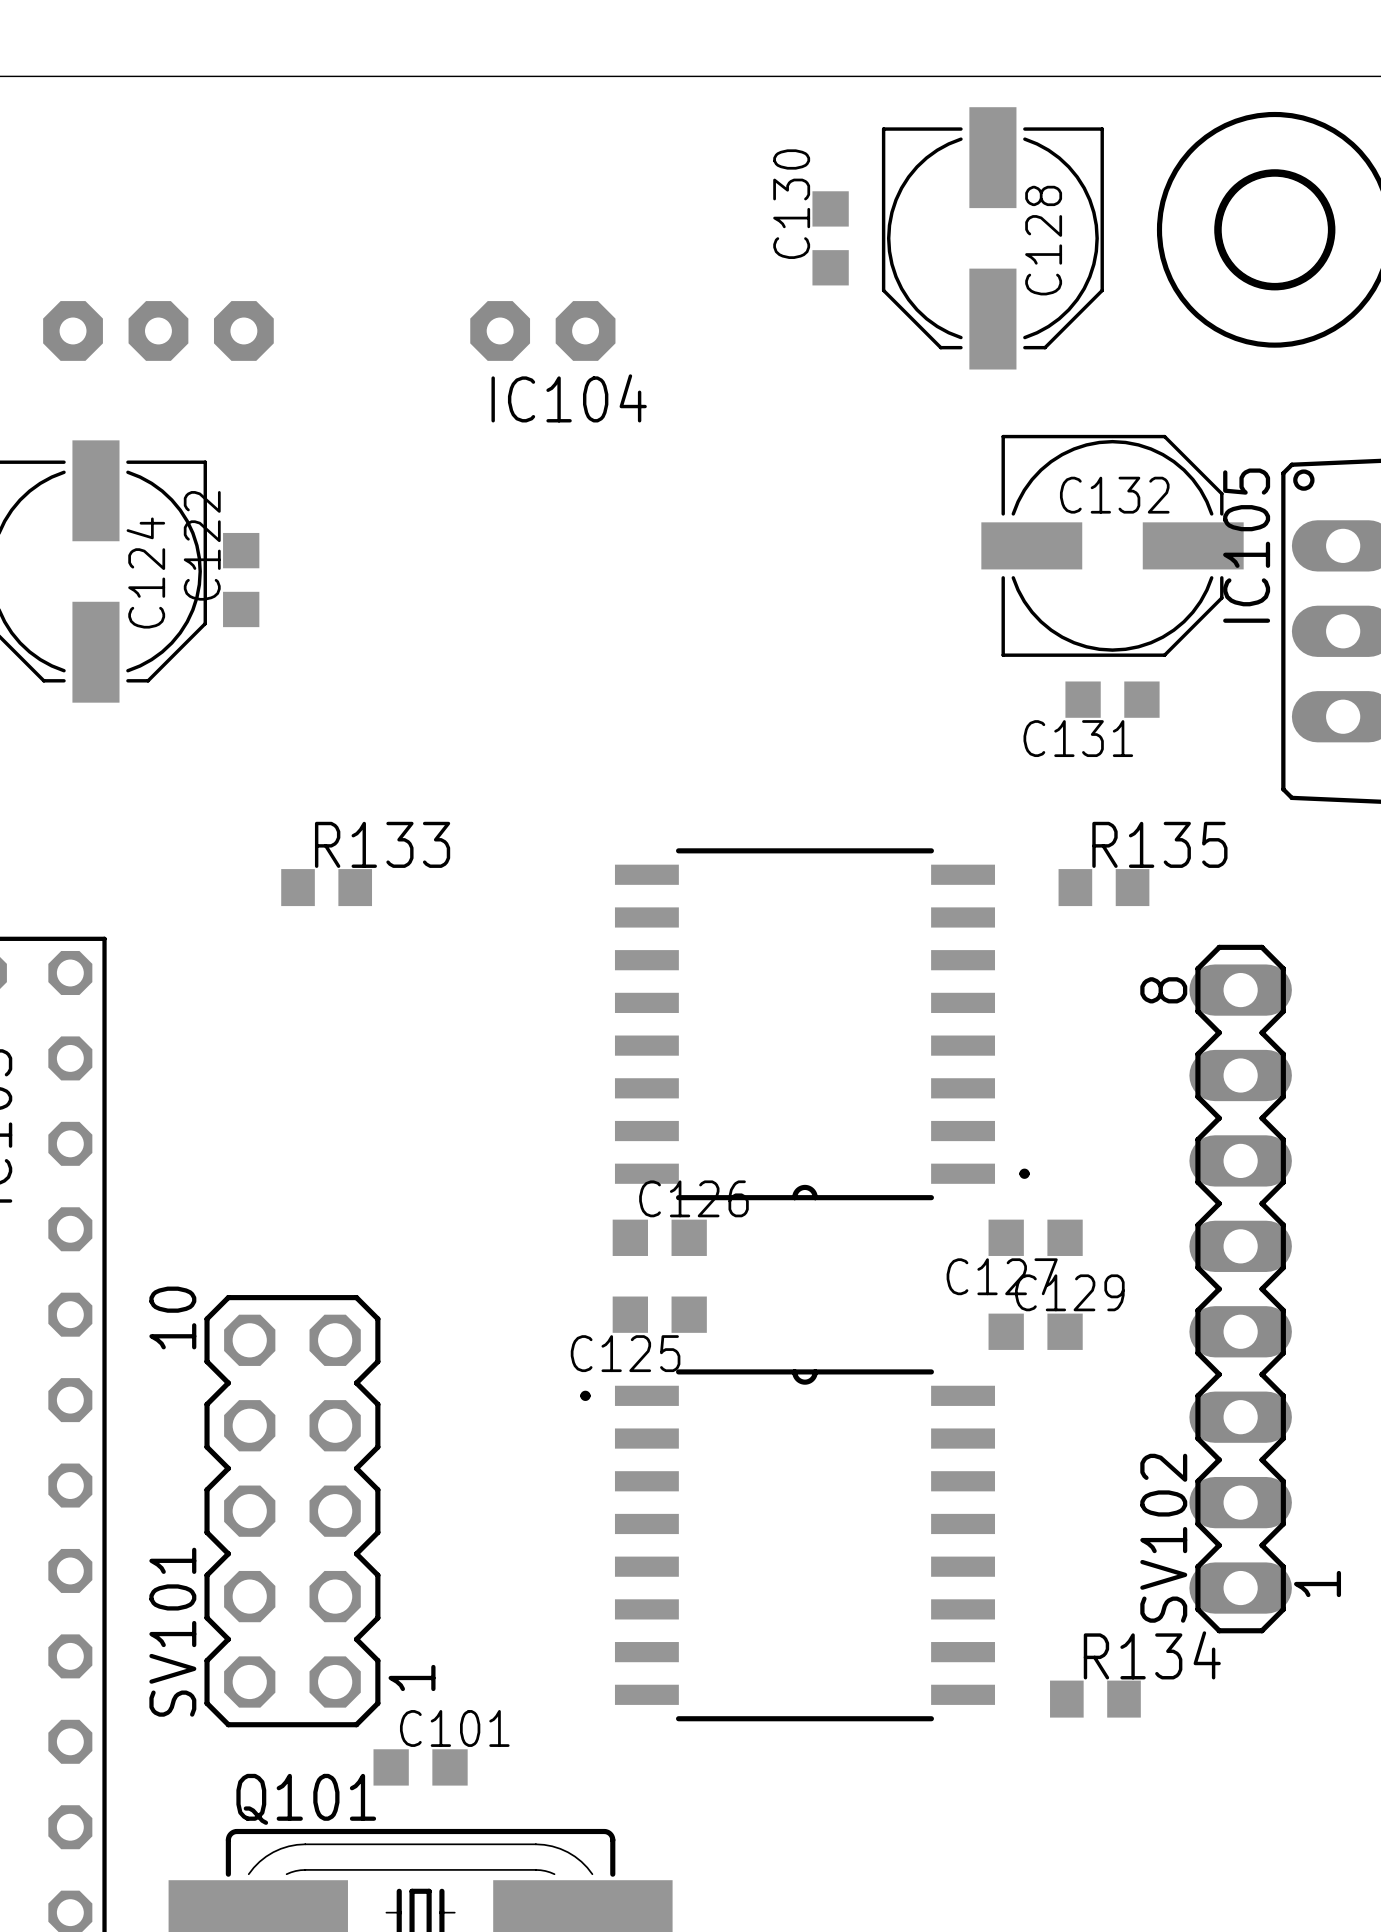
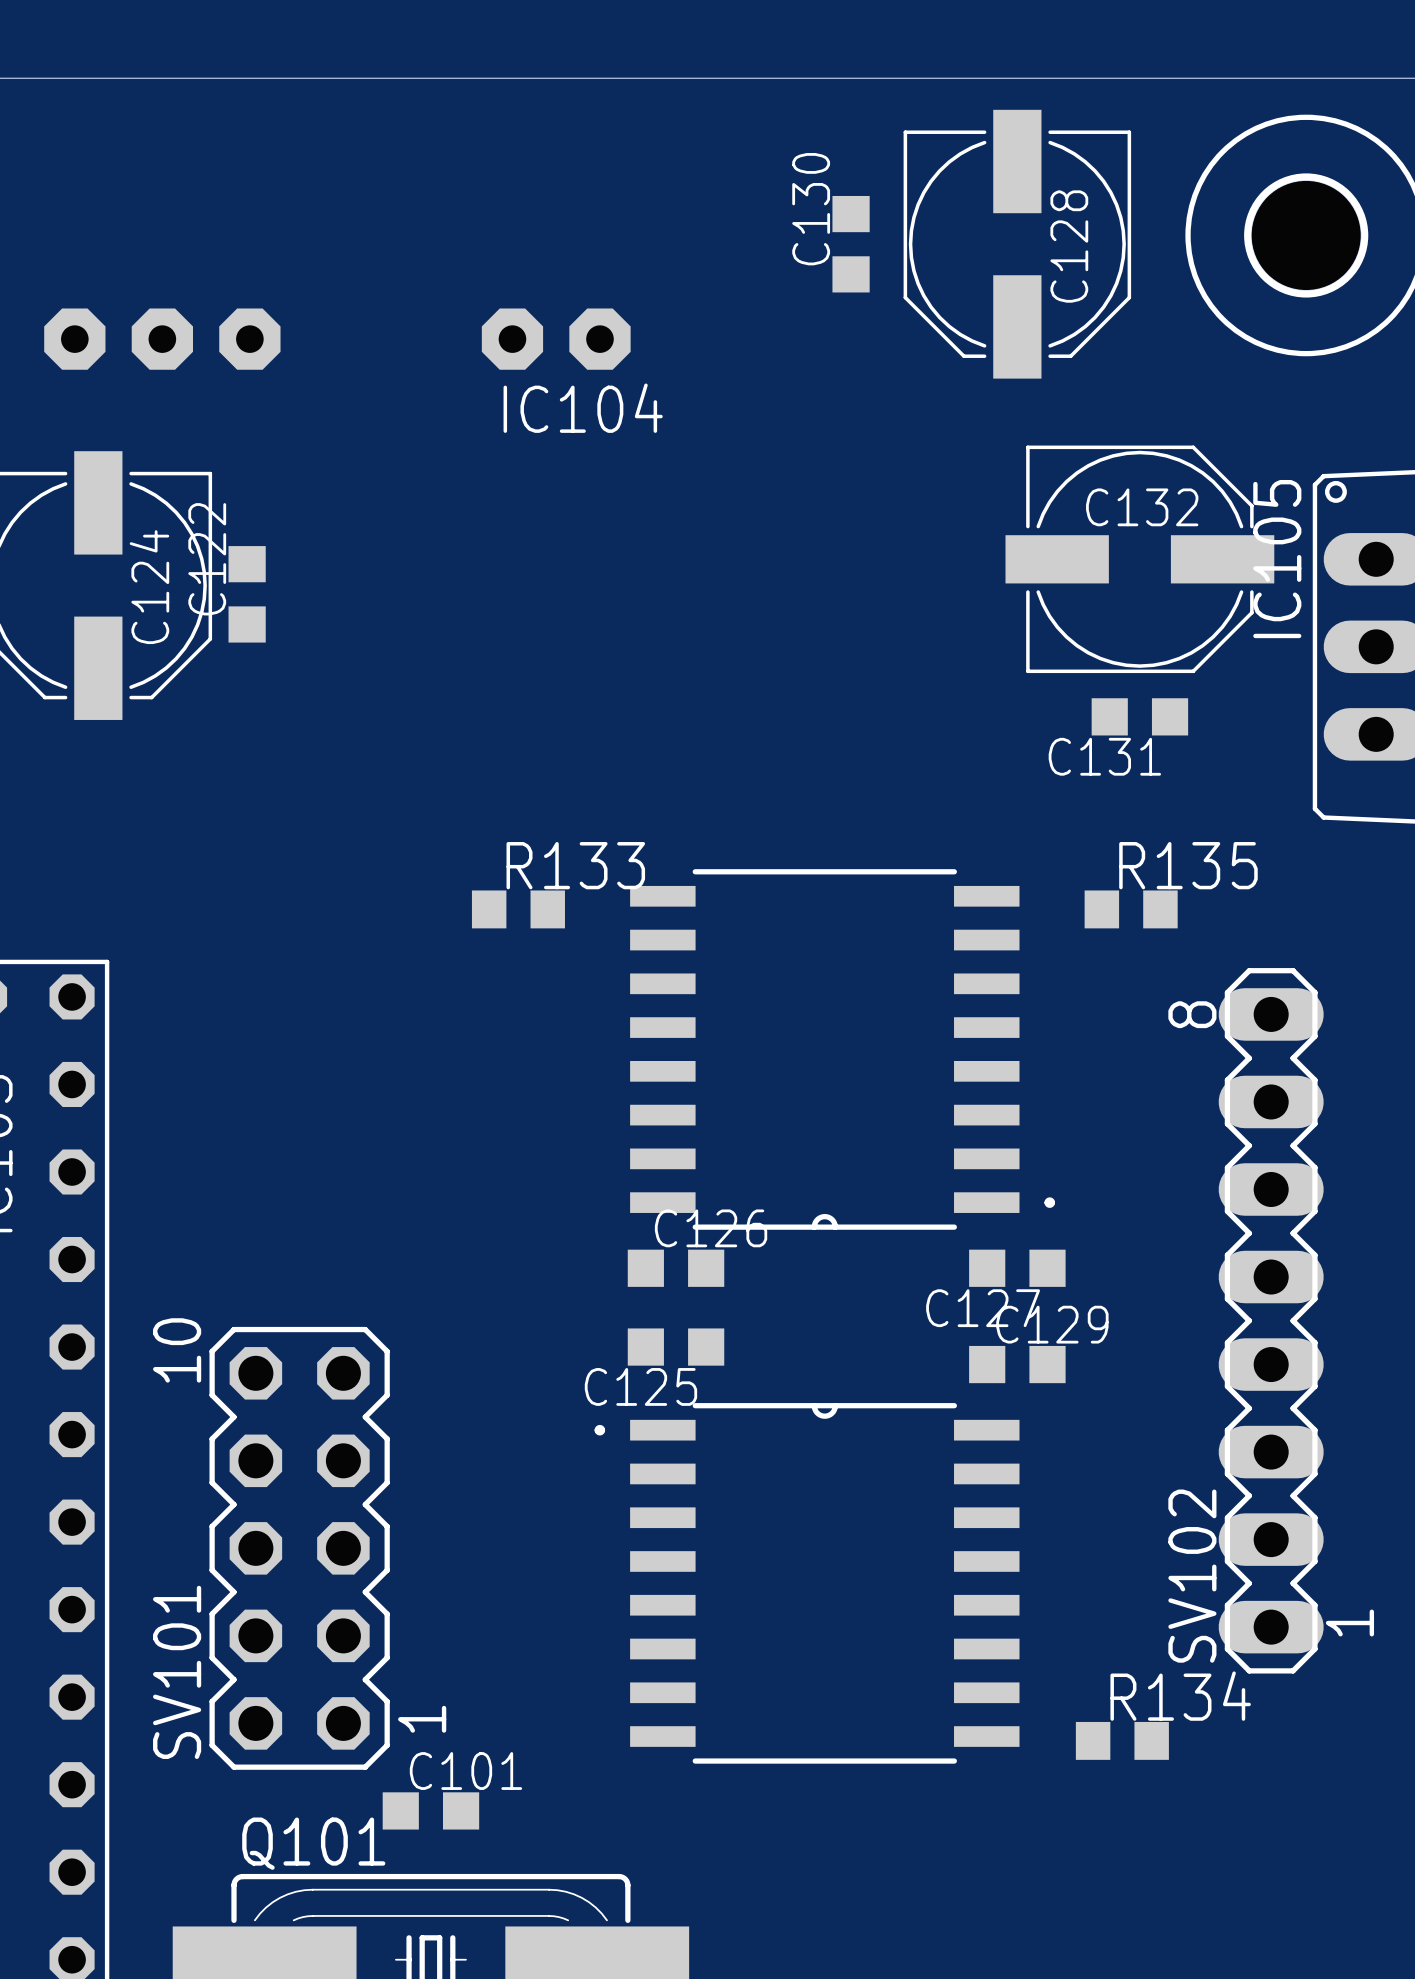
R133 position: (326, 887) -> (518, 909)
C127 position: (1035, 1237) -> (1017, 1268)
C129 position: (1035, 1331) -> (1017, 1364)

